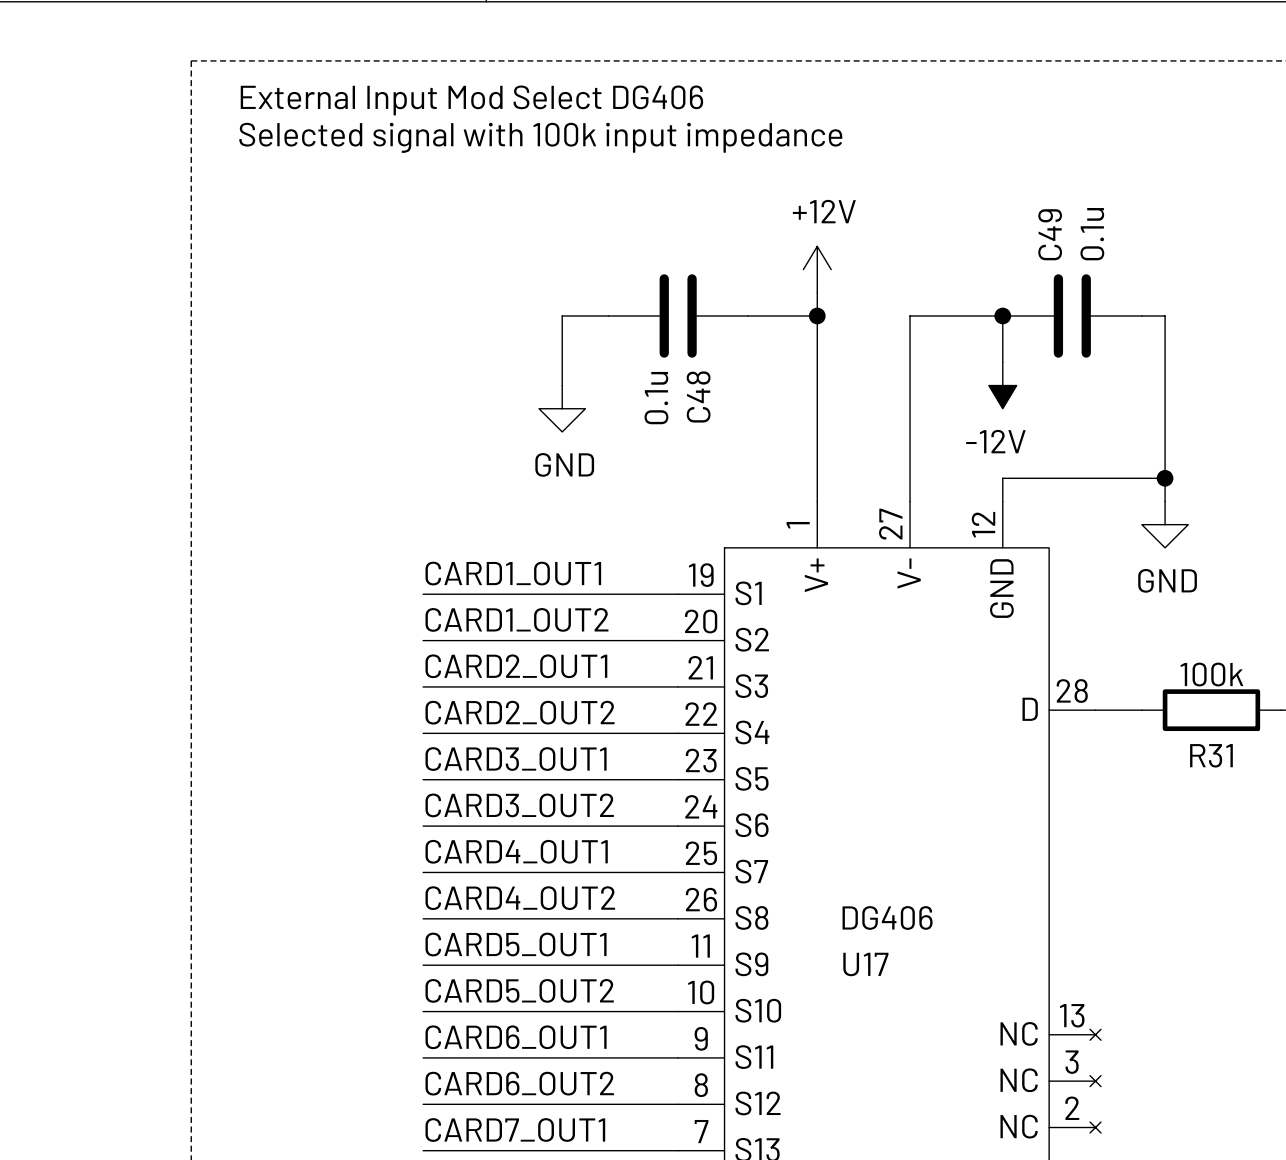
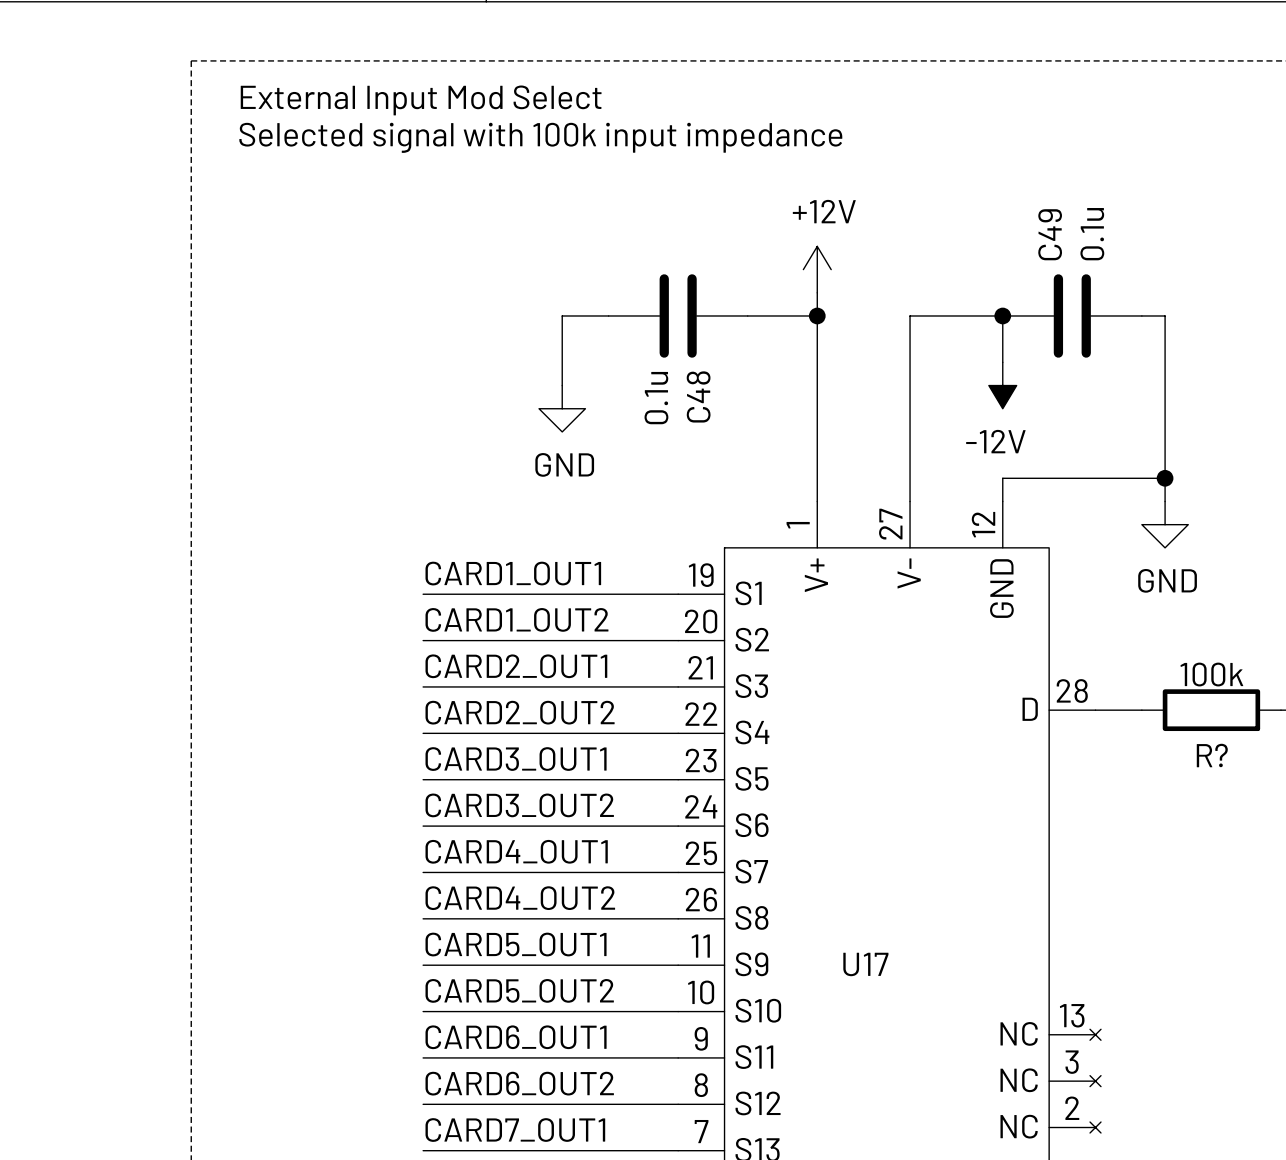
text: External Input Mod Select DG406 (471, 100) -> External Input Mod Select (421, 100)
R31 name: R31 (1211, 755) -> R? (1212, 755)
U17 value: DG406 (887, 917) -> none

